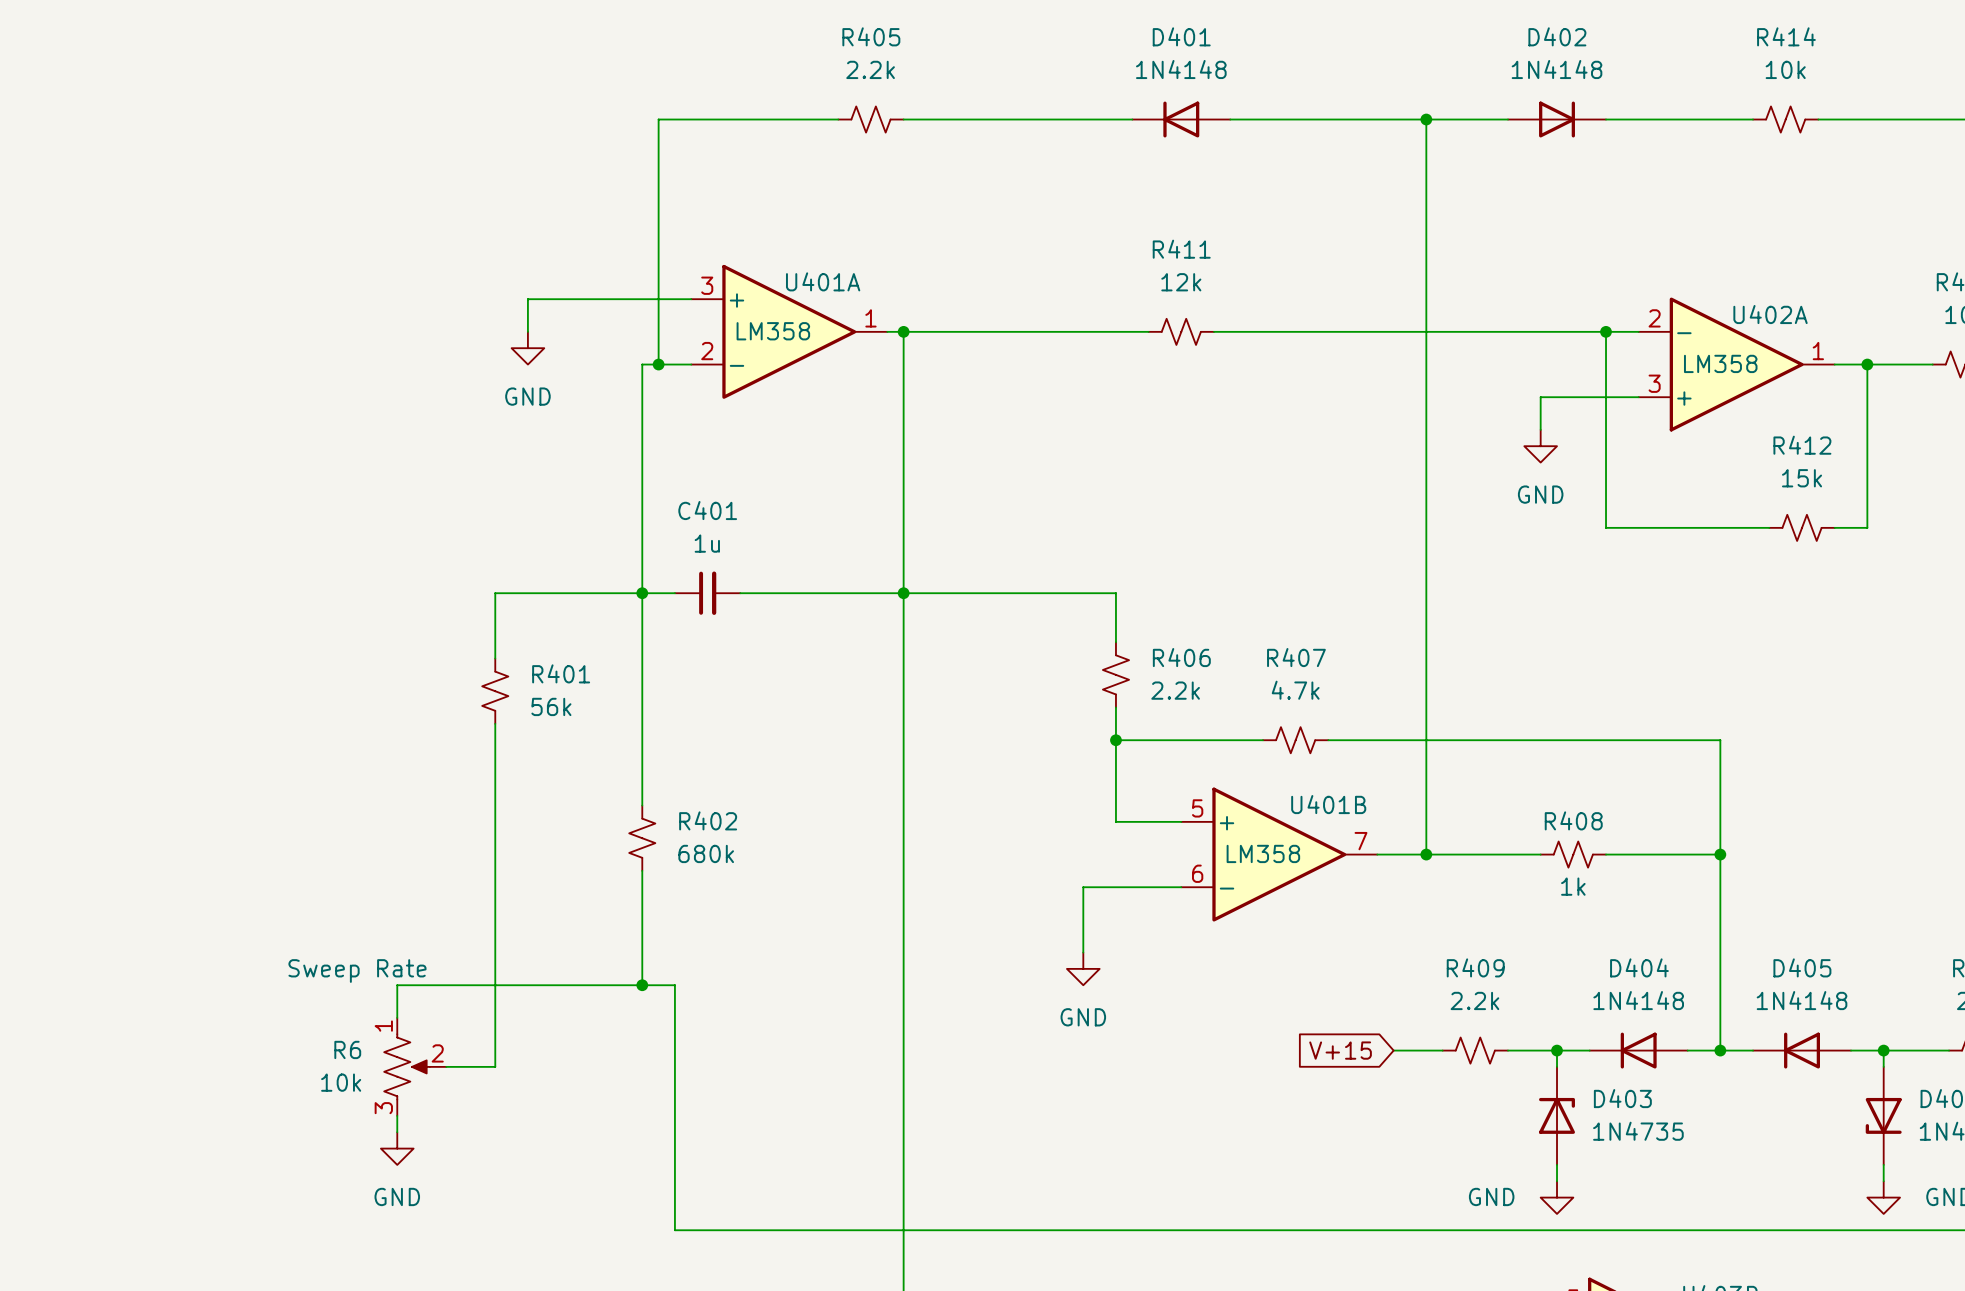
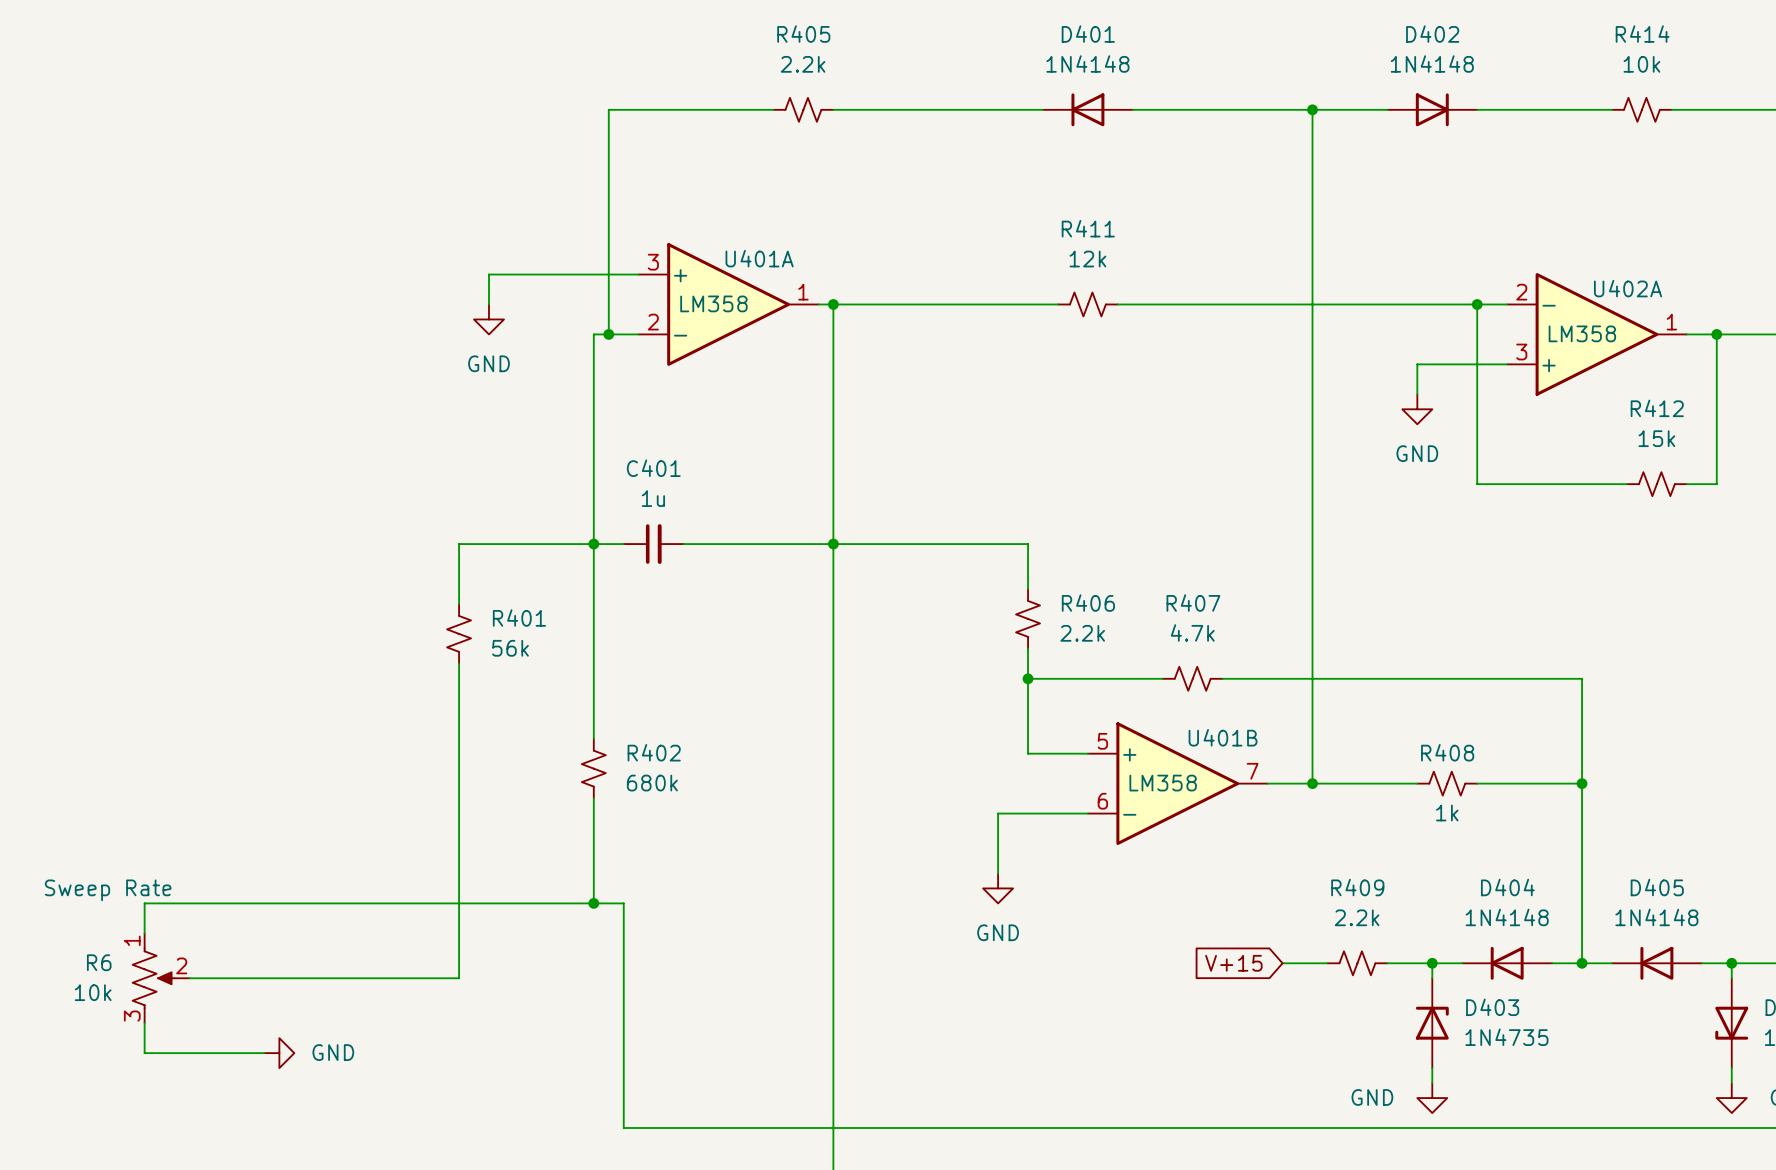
wire: (397, 985) (397, 1017) -> (369, 903) (144, 903) (144, 933)
wire: none -> (189, 978) (414, 978)
R6 position: (415, 1066) -> (161, 978)
wire: none -> (144, 1023) (144, 1053) (264, 1053)
wire: (397, 1115) (397, 1132) -> none
power symbol rotation: 0° (397, 1148) -> 90° counterclockwise (279, 1053)
power symbol position: GND (397, 1148) -> GND (279, 1053)

